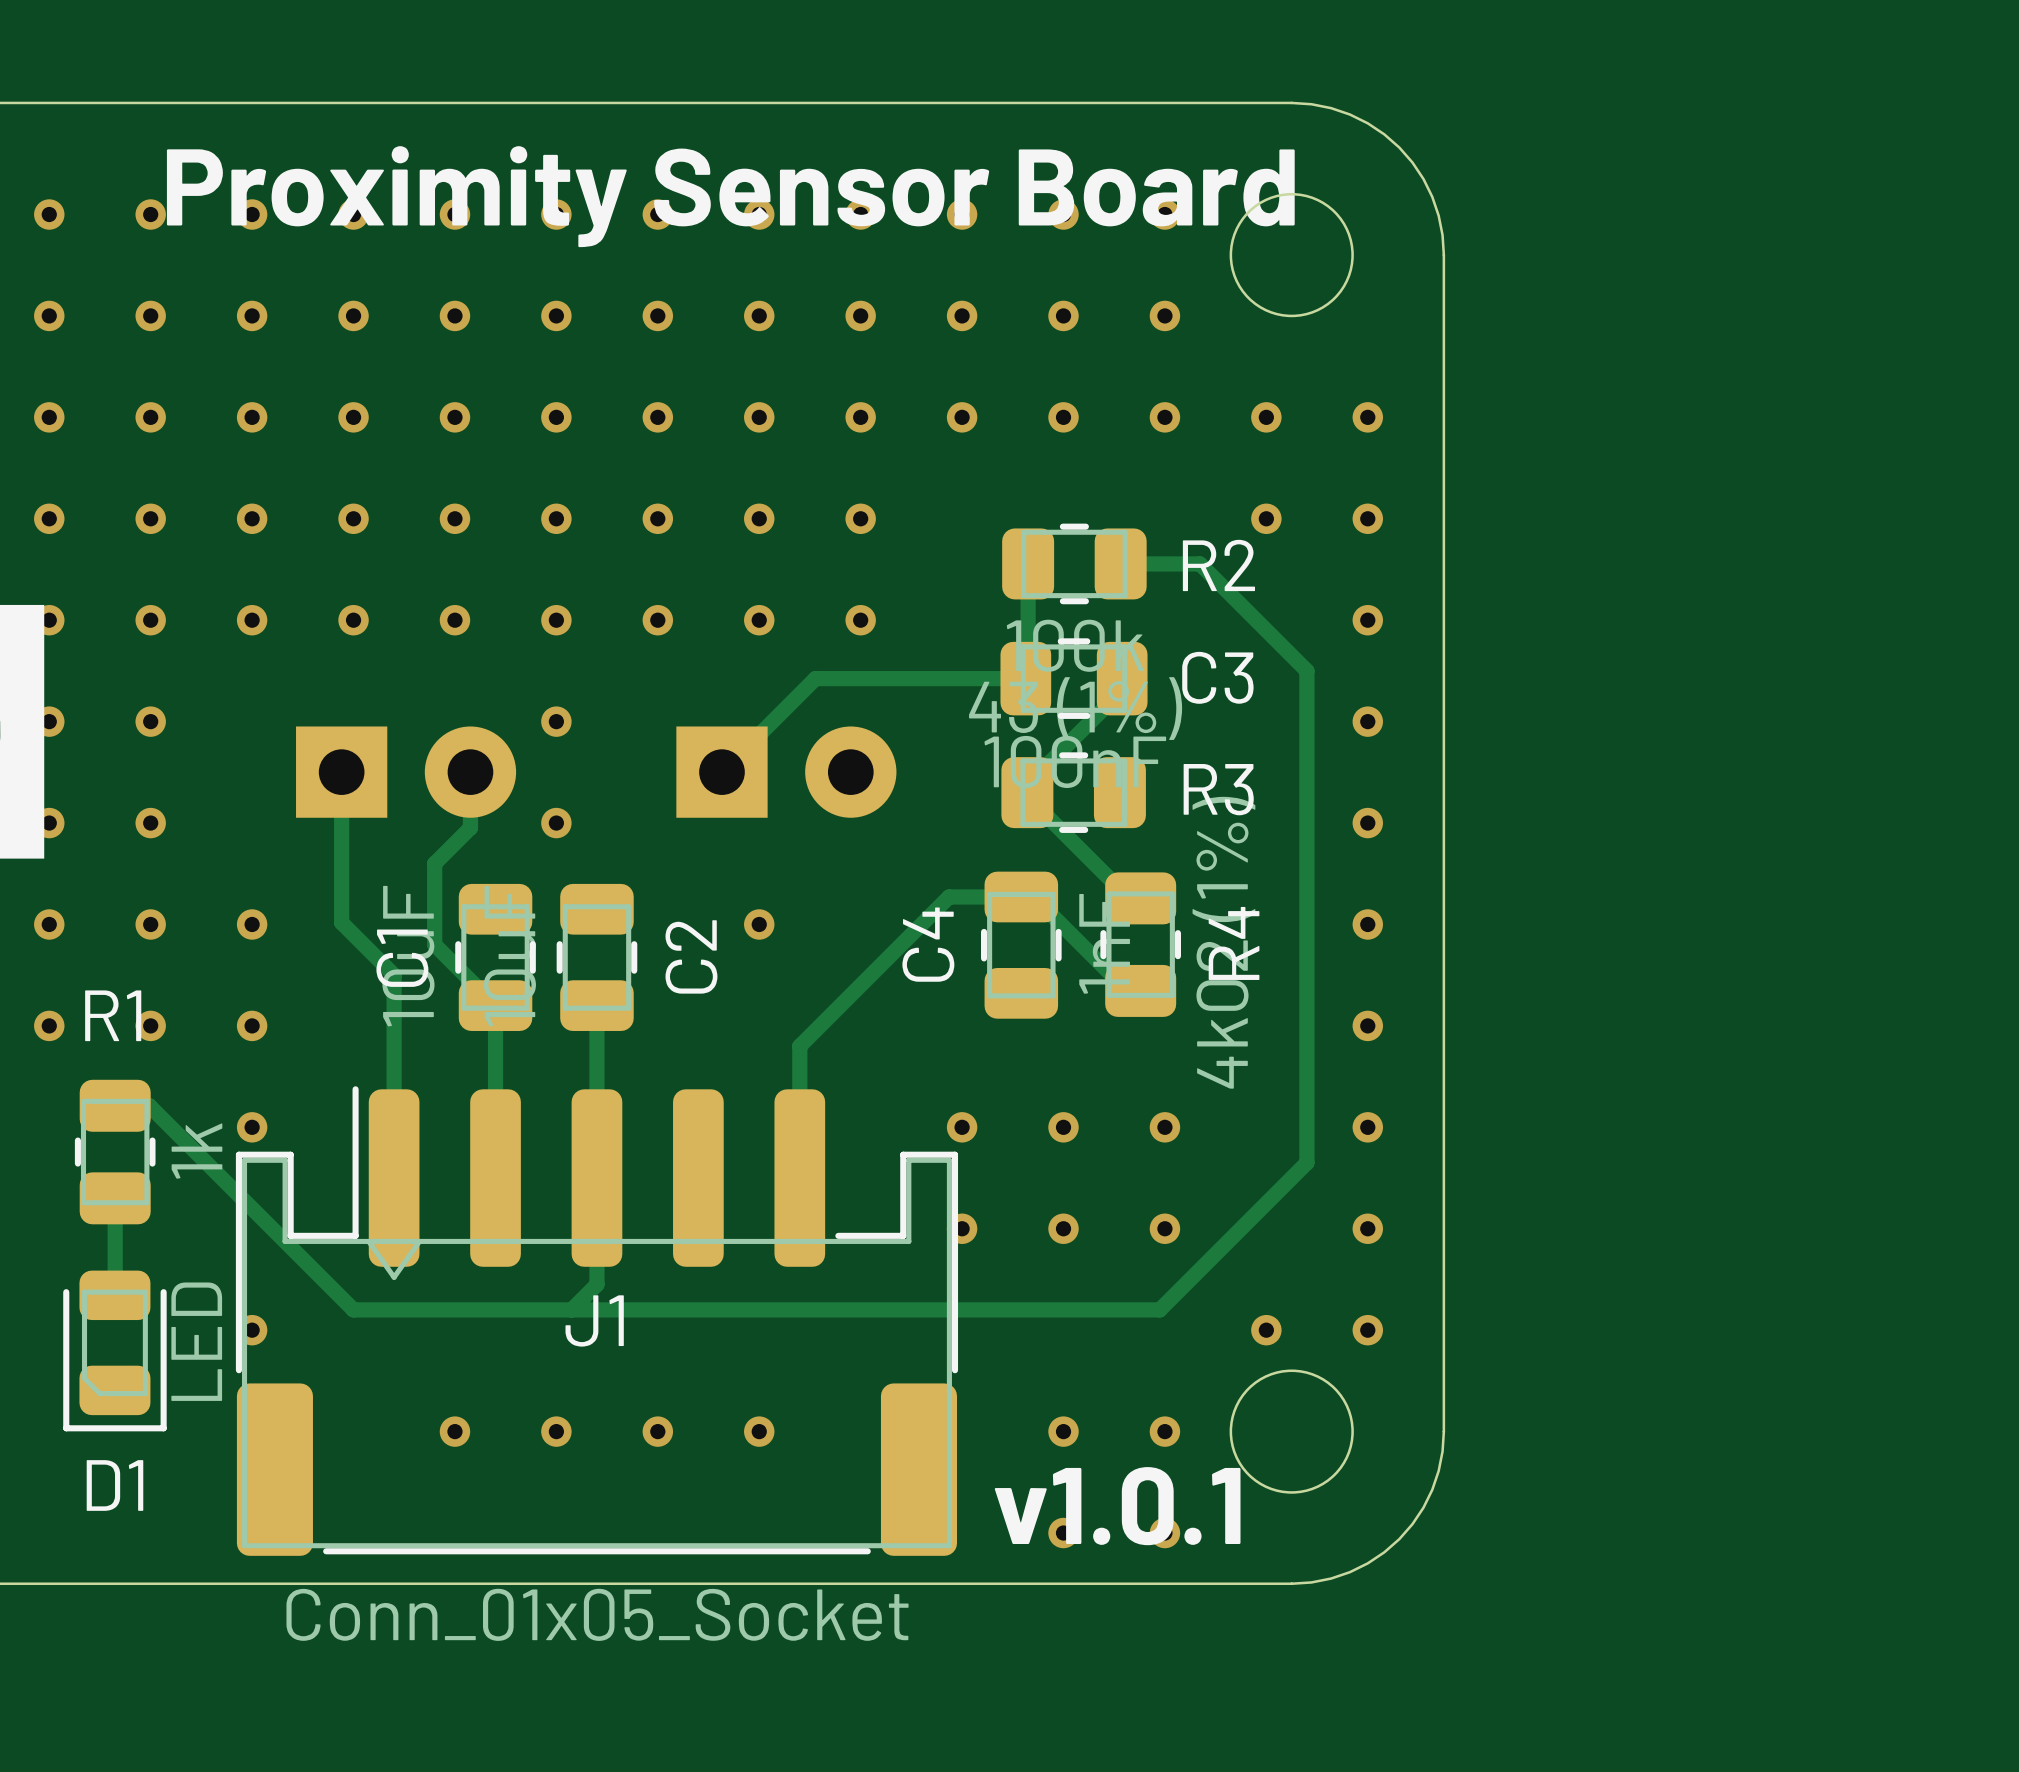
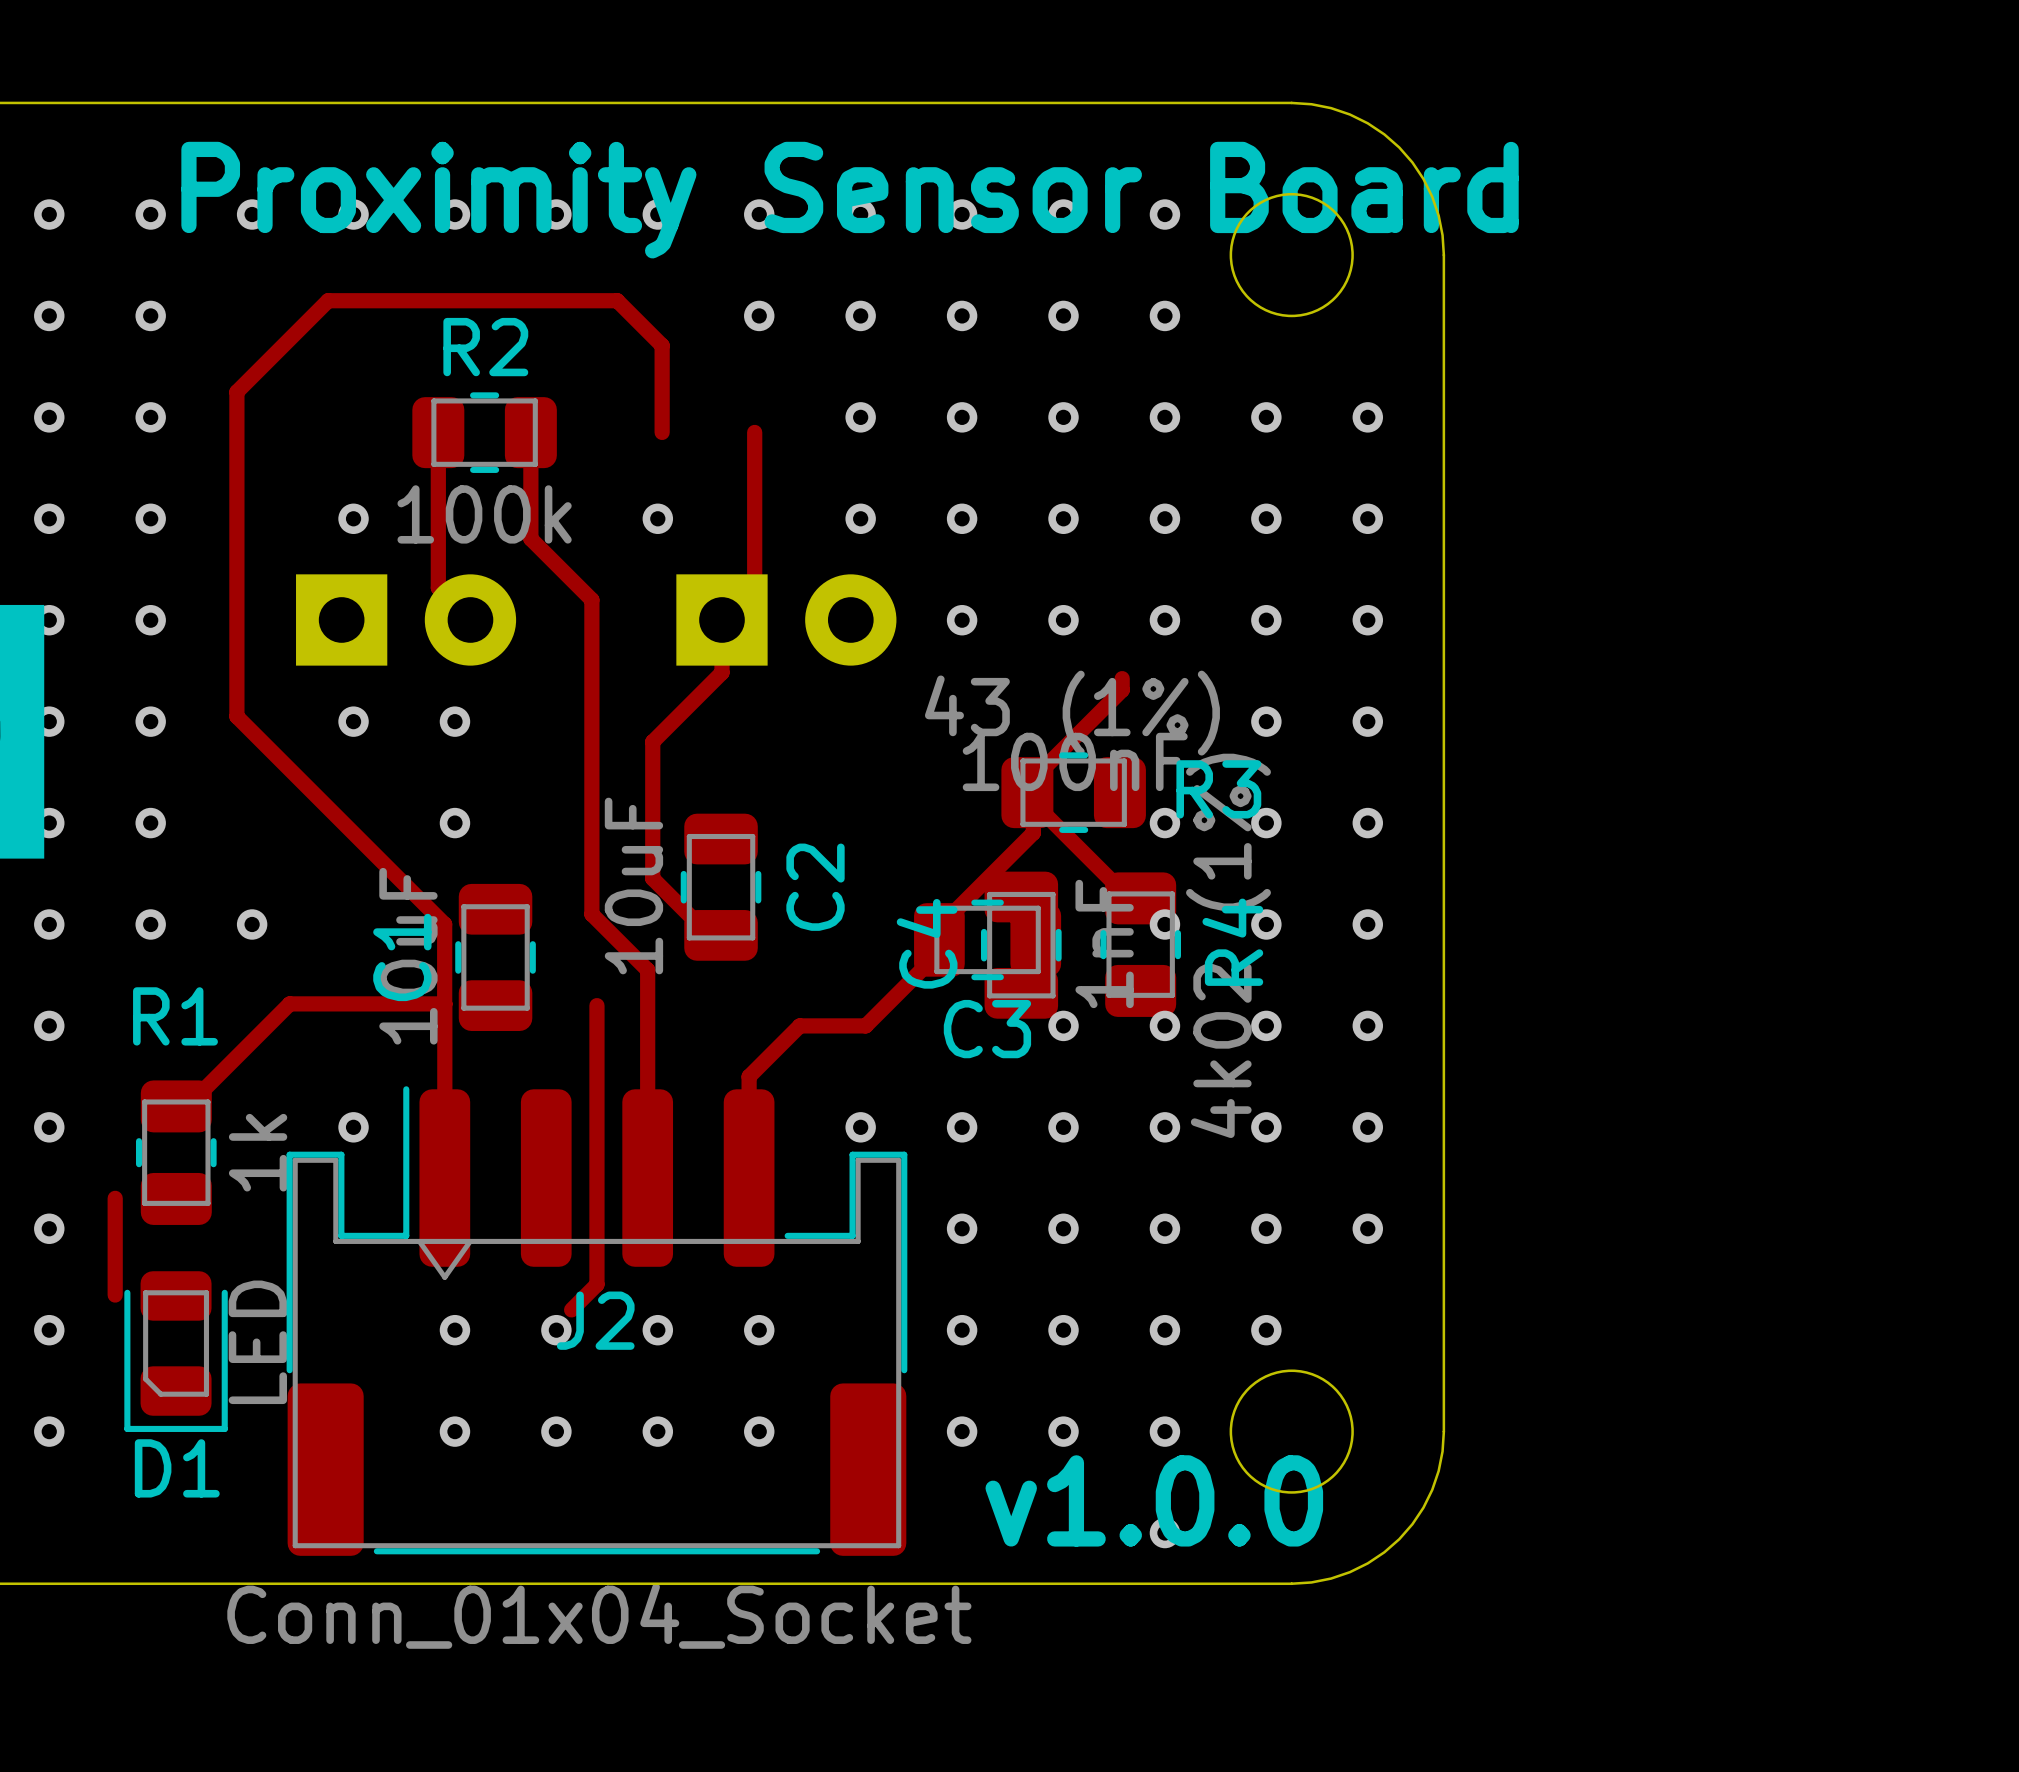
via: (252, 315) -> none
via: (353, 315) -> none
via: (454, 315) -> none
via: (556, 315) -> none
via: (657, 315) -> none
via: (252, 417) -> none
via: (353, 417) -> none
via: (454, 417) -> none
via: (556, 417) -> none
via: (657, 417) -> none
via: (759, 417) -> none
track: none -> (438, 432) (438, 587) (470, 619)
track: none -> (530, 432) (530, 538) (591, 599) (591, 914) (647, 970) (647, 1178)
track: none -> (662, 432) (662, 345) (617, 300) (328, 300) (236, 392) (236, 716) (444, 924) (444, 1178)
track: none -> (754, 432) (754, 587) (721, 619) (721, 672) (652, 741) (652, 878) (709, 935) (721, 935)
via: (252, 518) -> none
via: (454, 518) -> none
via: (556, 518) -> none
via: (759, 518) -> none
via: none -> (962, 518)
via: none -> (1063, 518)
via: none -> (1164, 518)
track: (1028, 563) (1028, 676) (1025, 678) (815, 678) (721, 772) -> none
R2 position: (1074, 563) -> (484, 432)
track: (1120, 563) (1199, 563) (1306, 670) (1306, 1162) (1159, 1309) (353, 1309) (149, 1105) (115, 1105) -> none
R2 name position: R2 (1218, 565) -> R2 (485, 347)
via: (252, 620) -> none
via: (353, 620) -> none
via: (454, 620) -> none
via: (556, 620) -> none
via: (657, 620) -> none
via: (759, 620) -> none
via: (860, 620) -> none
via: none -> (962, 620)
via: none -> (1063, 620)
via: none -> (1164, 620)
via: none -> (1266, 620)
C3 name position: C3 (1217, 677) -> C3 (987, 1029)
C3 position: (1074, 678) -> (987, 939)
via: none -> (353, 721)
via: none -> (454, 721)
via: (556, 721) -> none
via: none -> (1266, 721)
track: (341, 772) (341, 922) (394, 975) (394, 1178) -> none
part position: (406, 772) -> (406, 619)
track: (470, 772) (470, 827) (434, 863) (434, 944) (495, 1005) (495, 1178) -> none
part position: (786, 772) -> (786, 619)
track: none -> (1033, 820) (1033, 832) (939, 926) (939, 952) (865, 1025) (799, 1025) (749, 1076) (749, 1178)
via: none -> (454, 823)
via: (556, 823) -> none
via: none -> (1164, 823)
via: none -> (1266, 823)
via: (759, 924) -> none
via: none -> (1164, 924)
via: none -> (1266, 924)
C2 position: (596, 957) -> (721, 887)
track: (1140, 990) (1127, 990) (1033, 896) (949, 896) (799, 1046) (799, 1178) -> none
track: none -> (444, 1003) (289, 1003) (187, 1106) (176, 1106)
via: (150, 1025) -> none
via: (252, 1025) -> none
via: none -> (1063, 1025)
via: none -> (1164, 1025)
via: none -> (1266, 1025)
via: none -> (49, 1127)
via: (252, 1127) -> none
via: none -> (353, 1127)
via: none -> (860, 1127)
via: none -> (1266, 1127)
R1 position: (115, 1152) -> (176, 1152)
via: none -> (49, 1228)
via: none -> (1266, 1228)
J1: Conn_01x05_Socket (596, 1321) -> none
J2: none -> Conn_01x04_Socket (596, 1321)
via: none -> (49, 1330)
via: (252, 1330) -> none
via: none -> (454, 1330)
via: none -> (556, 1330)
via: none -> (657, 1330)
via: none -> (759, 1330)
via: none -> (962, 1330)
via: none -> (1063, 1330)
via: none -> (1164, 1330)
via: (1367, 1330) -> none
D1 position: (114, 1350) -> (176, 1351)
via: none -> (49, 1431)
via: none -> (962, 1431)
D1 name position: D1 (114, 1485) -> D1 (177, 1468)
text: v1.0.1 (1117, 1506) -> v1.0.0 (1154, 1500)
via: (1063, 1533) -> none

